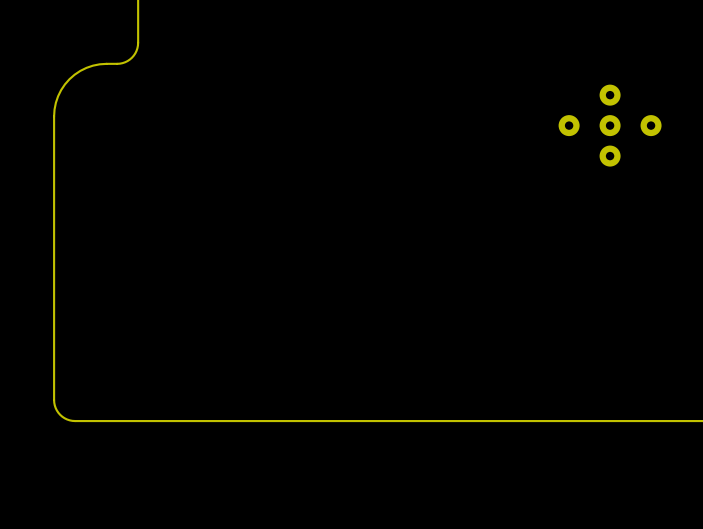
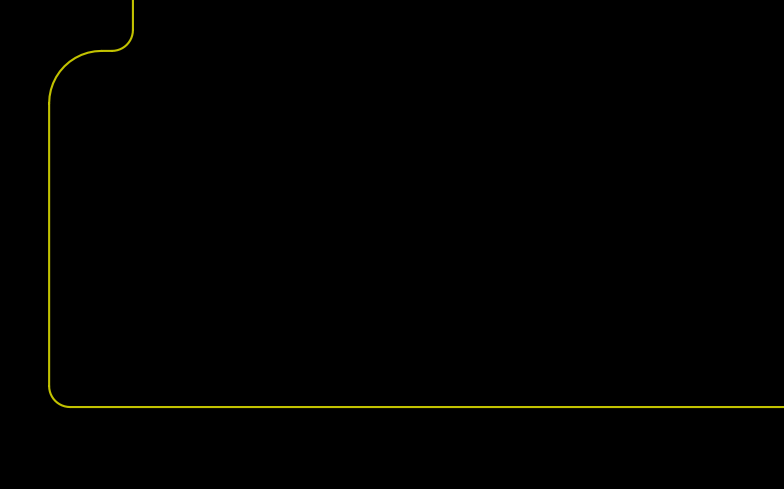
part: (610, 125) -> none

